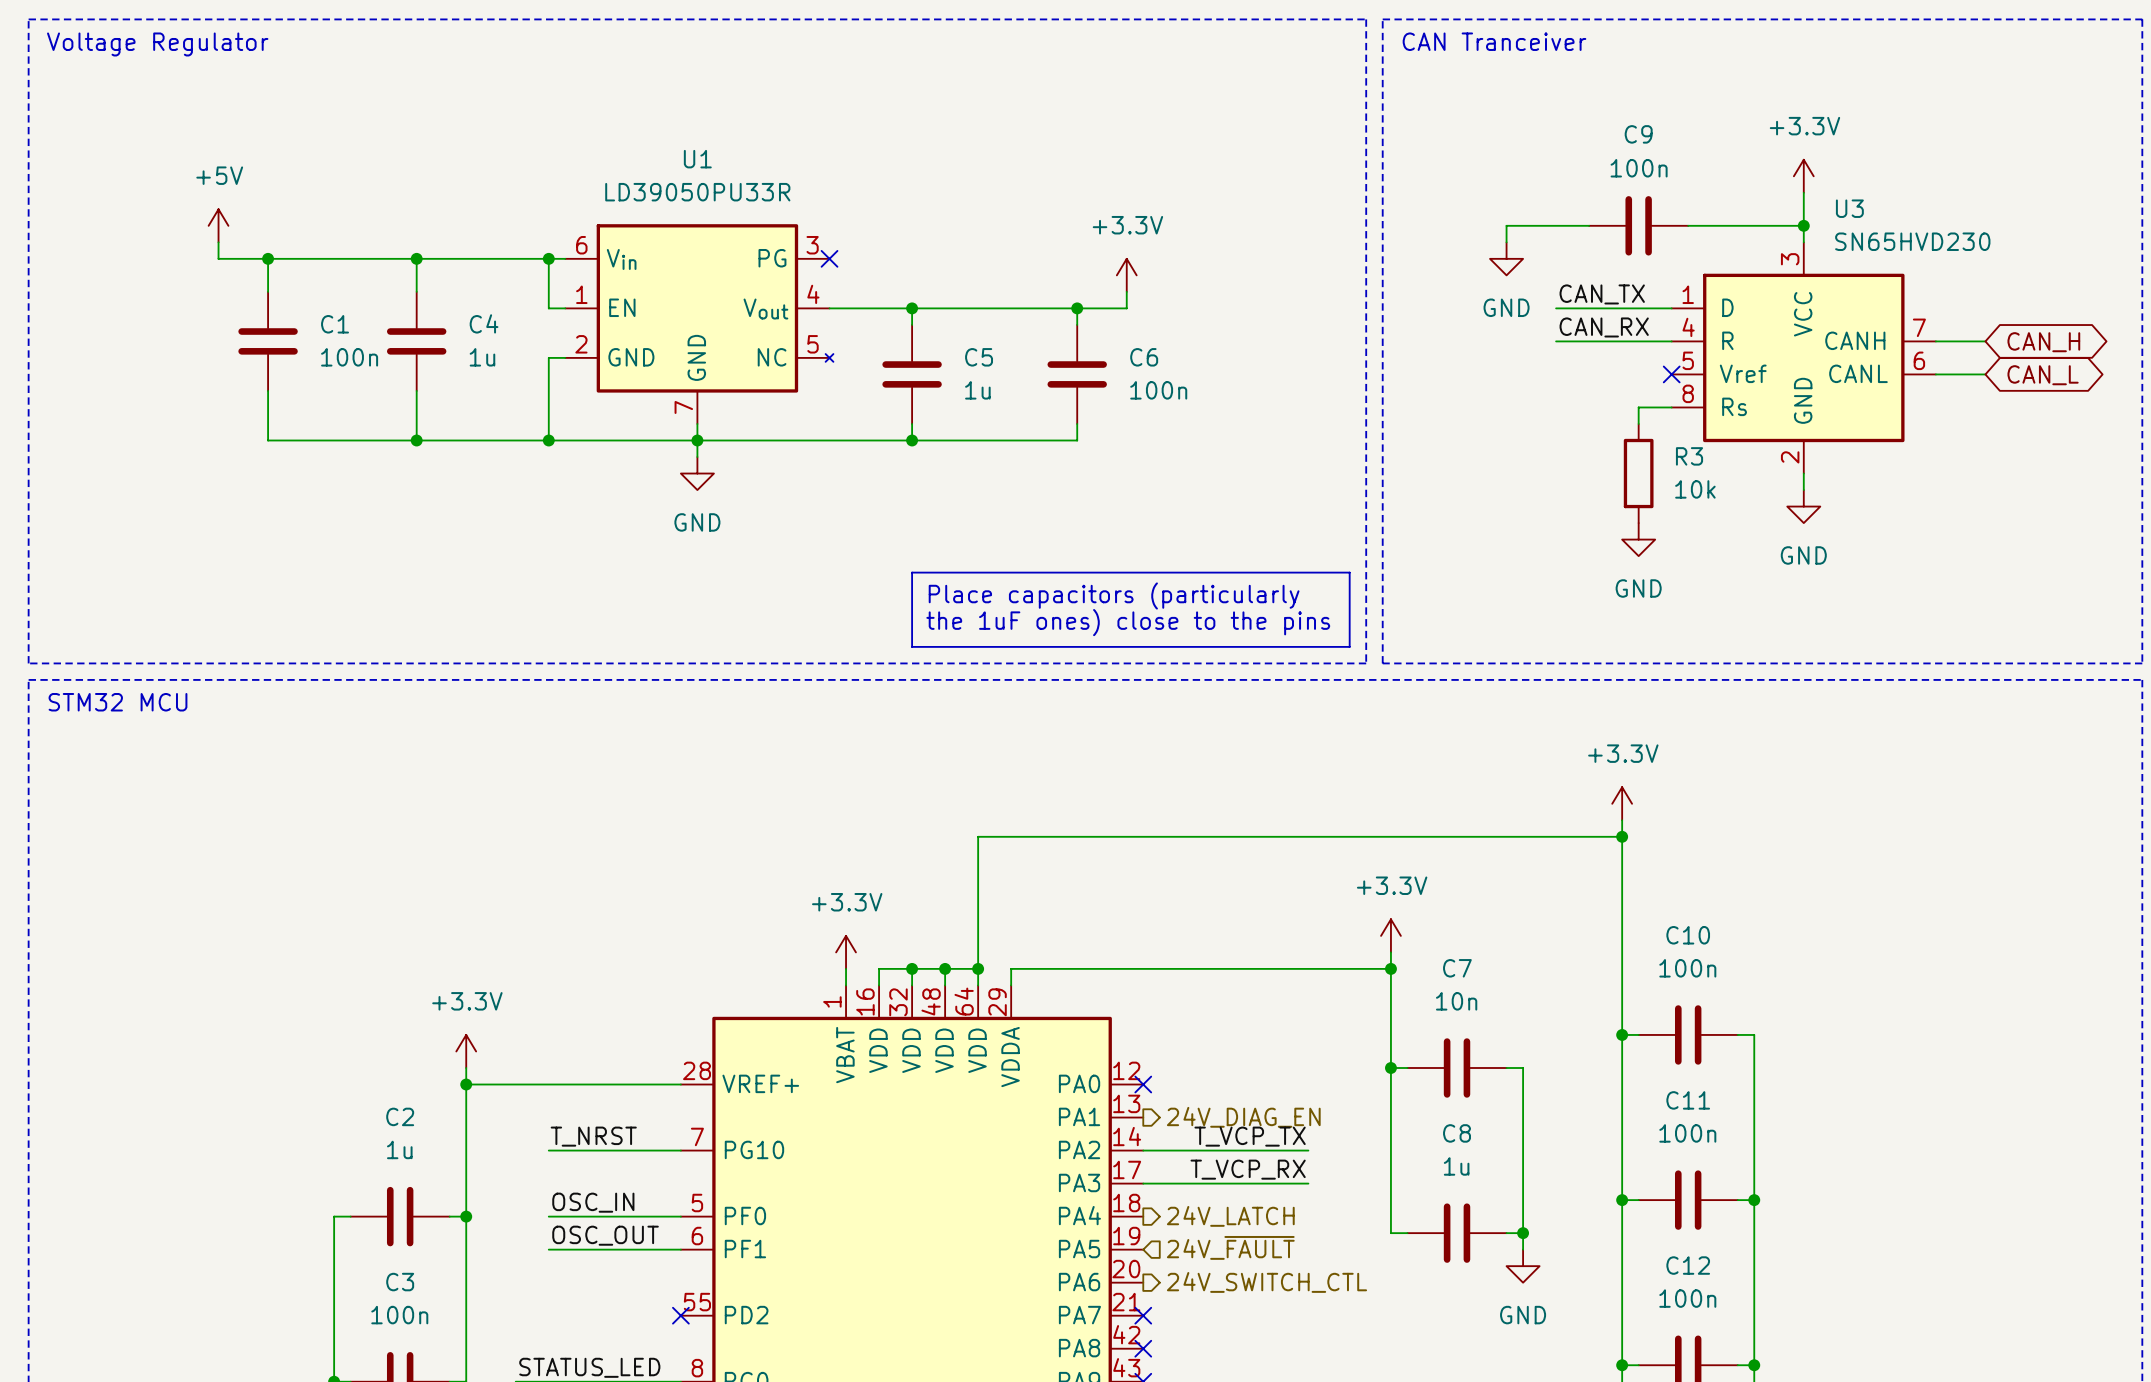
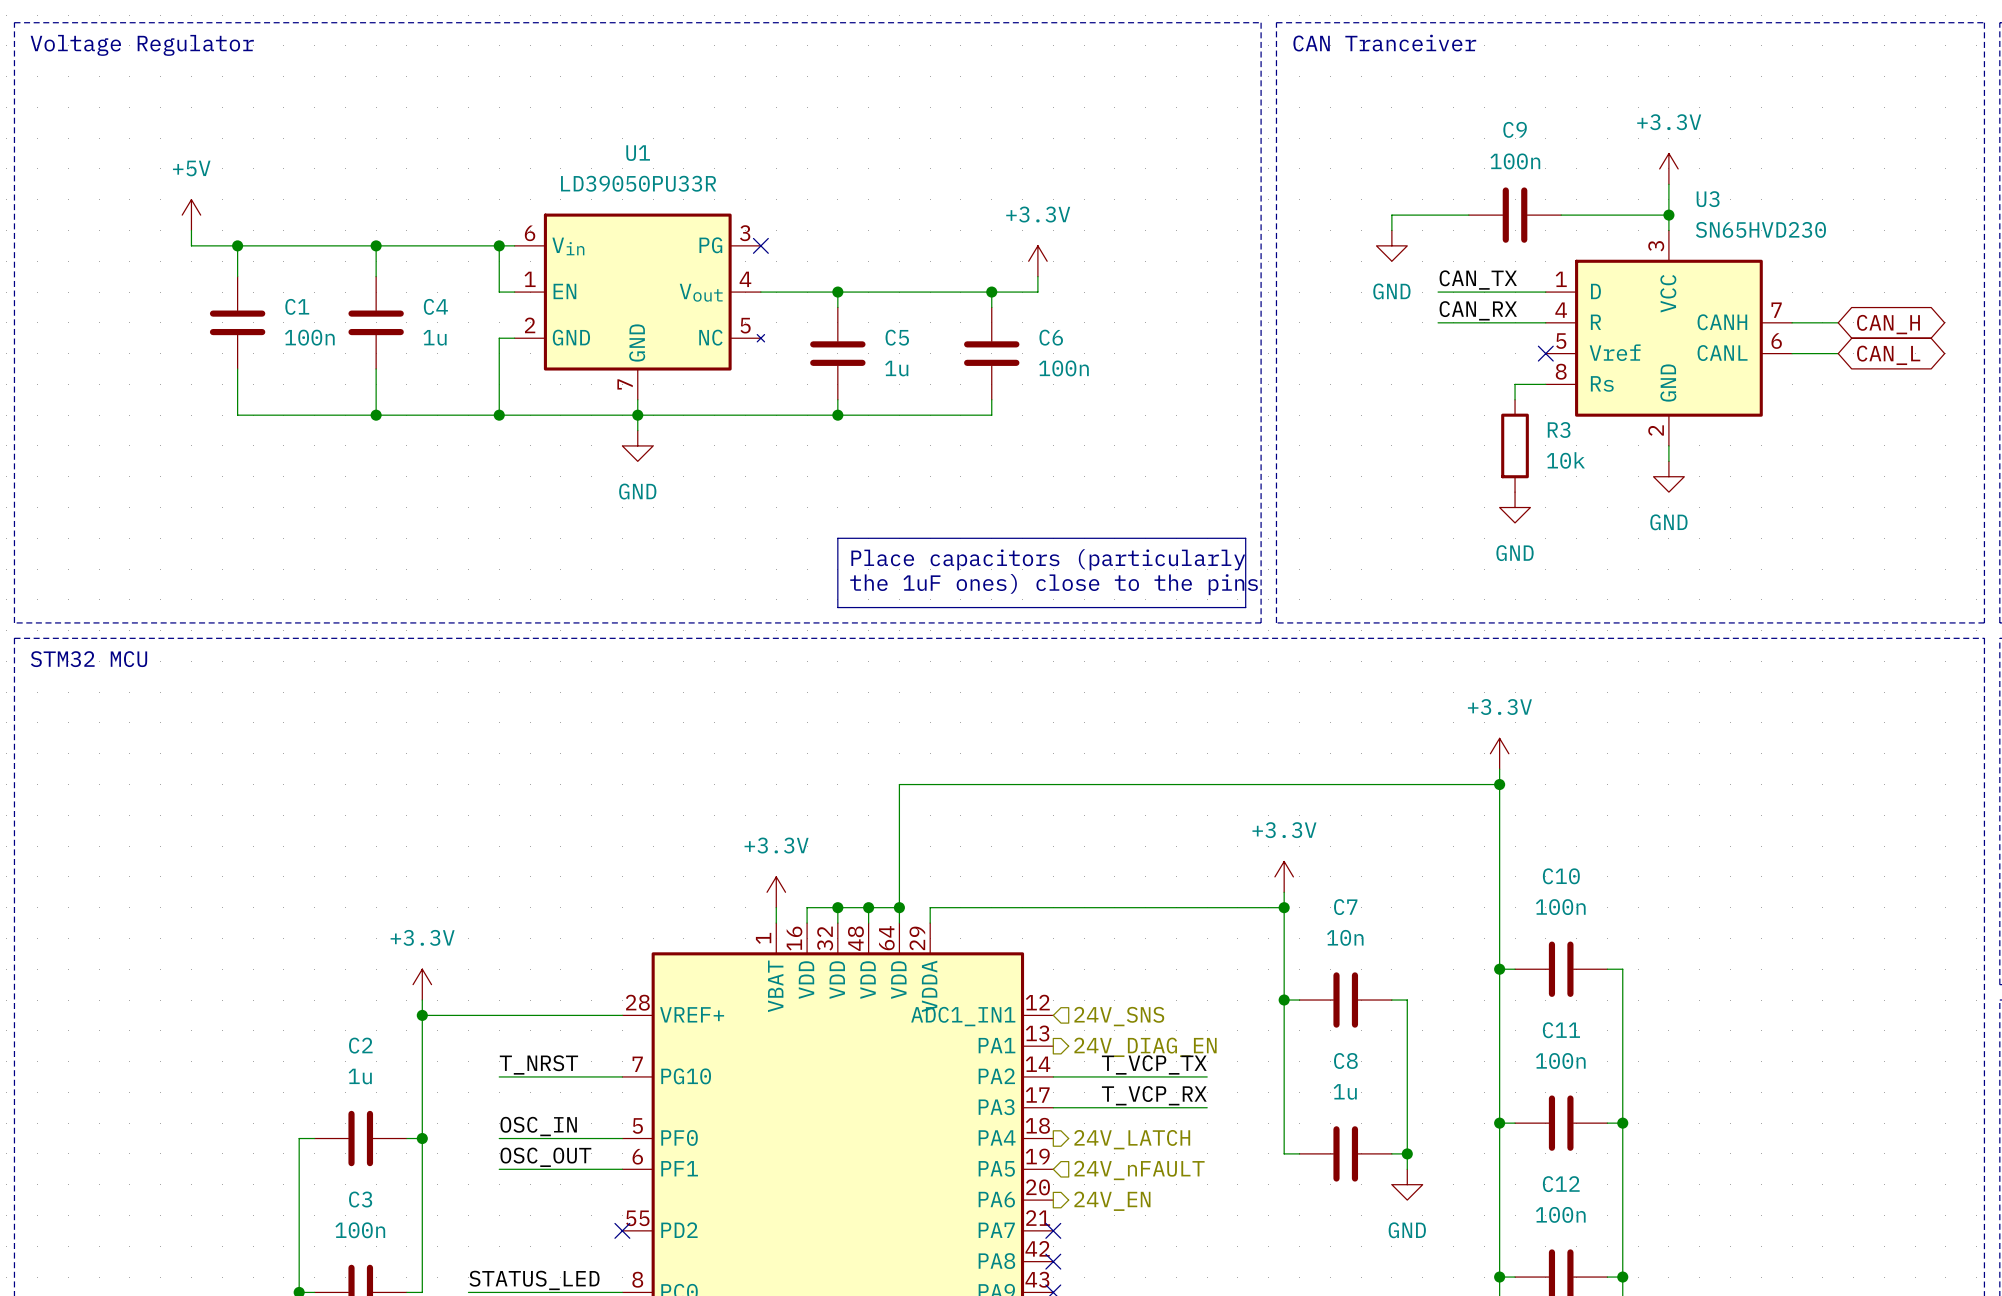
part pin name: PA0 (1079, 1083) -> ADC1_IN1 (963, 1016)
no-connect mark: (1143, 1084) -> none
hierarchical label: none -> 24V_SNS (1119, 1016)
hierarchical label: 24V_~{FAULT} (1230, 1247) -> 24V_nFAULT (1139, 1170)
hierarchical label: 24V_SWITCH_CTL (1266, 1282) -> 24V_EN (1112, 1201)

